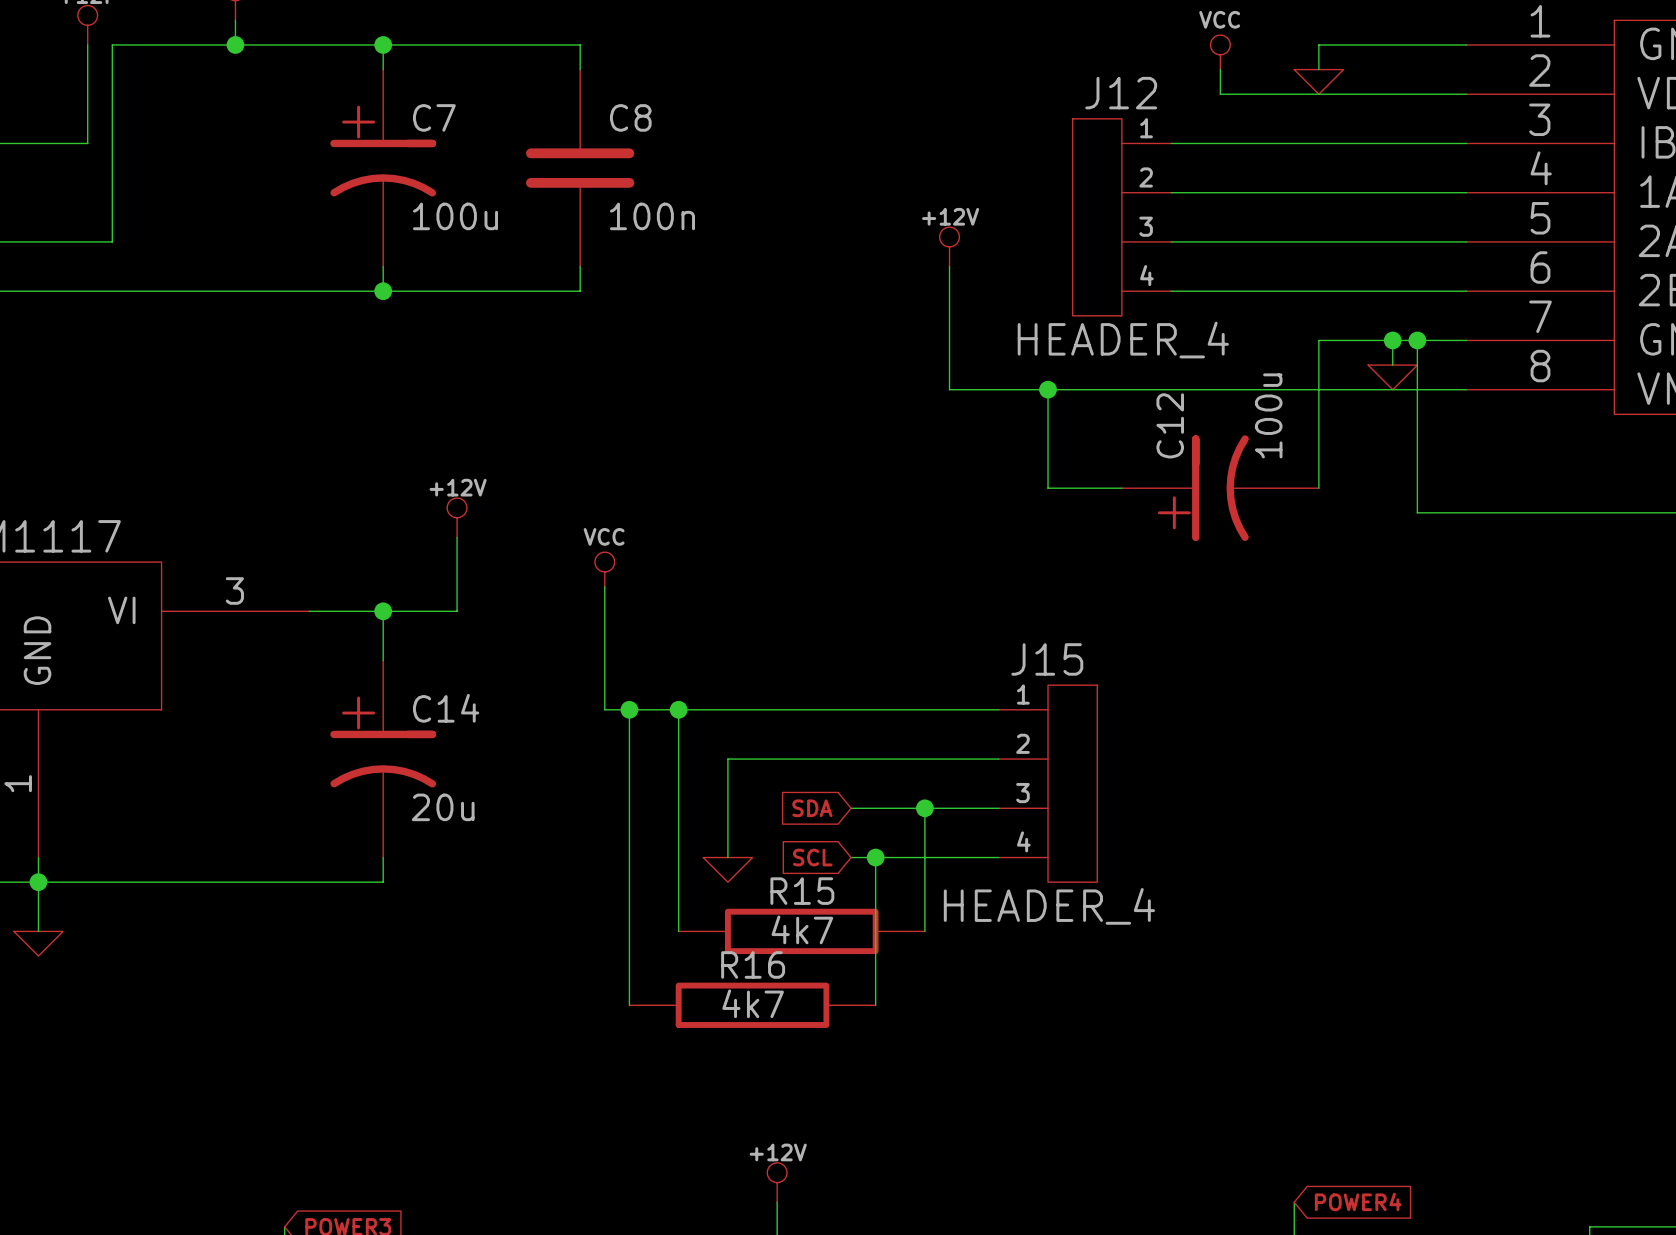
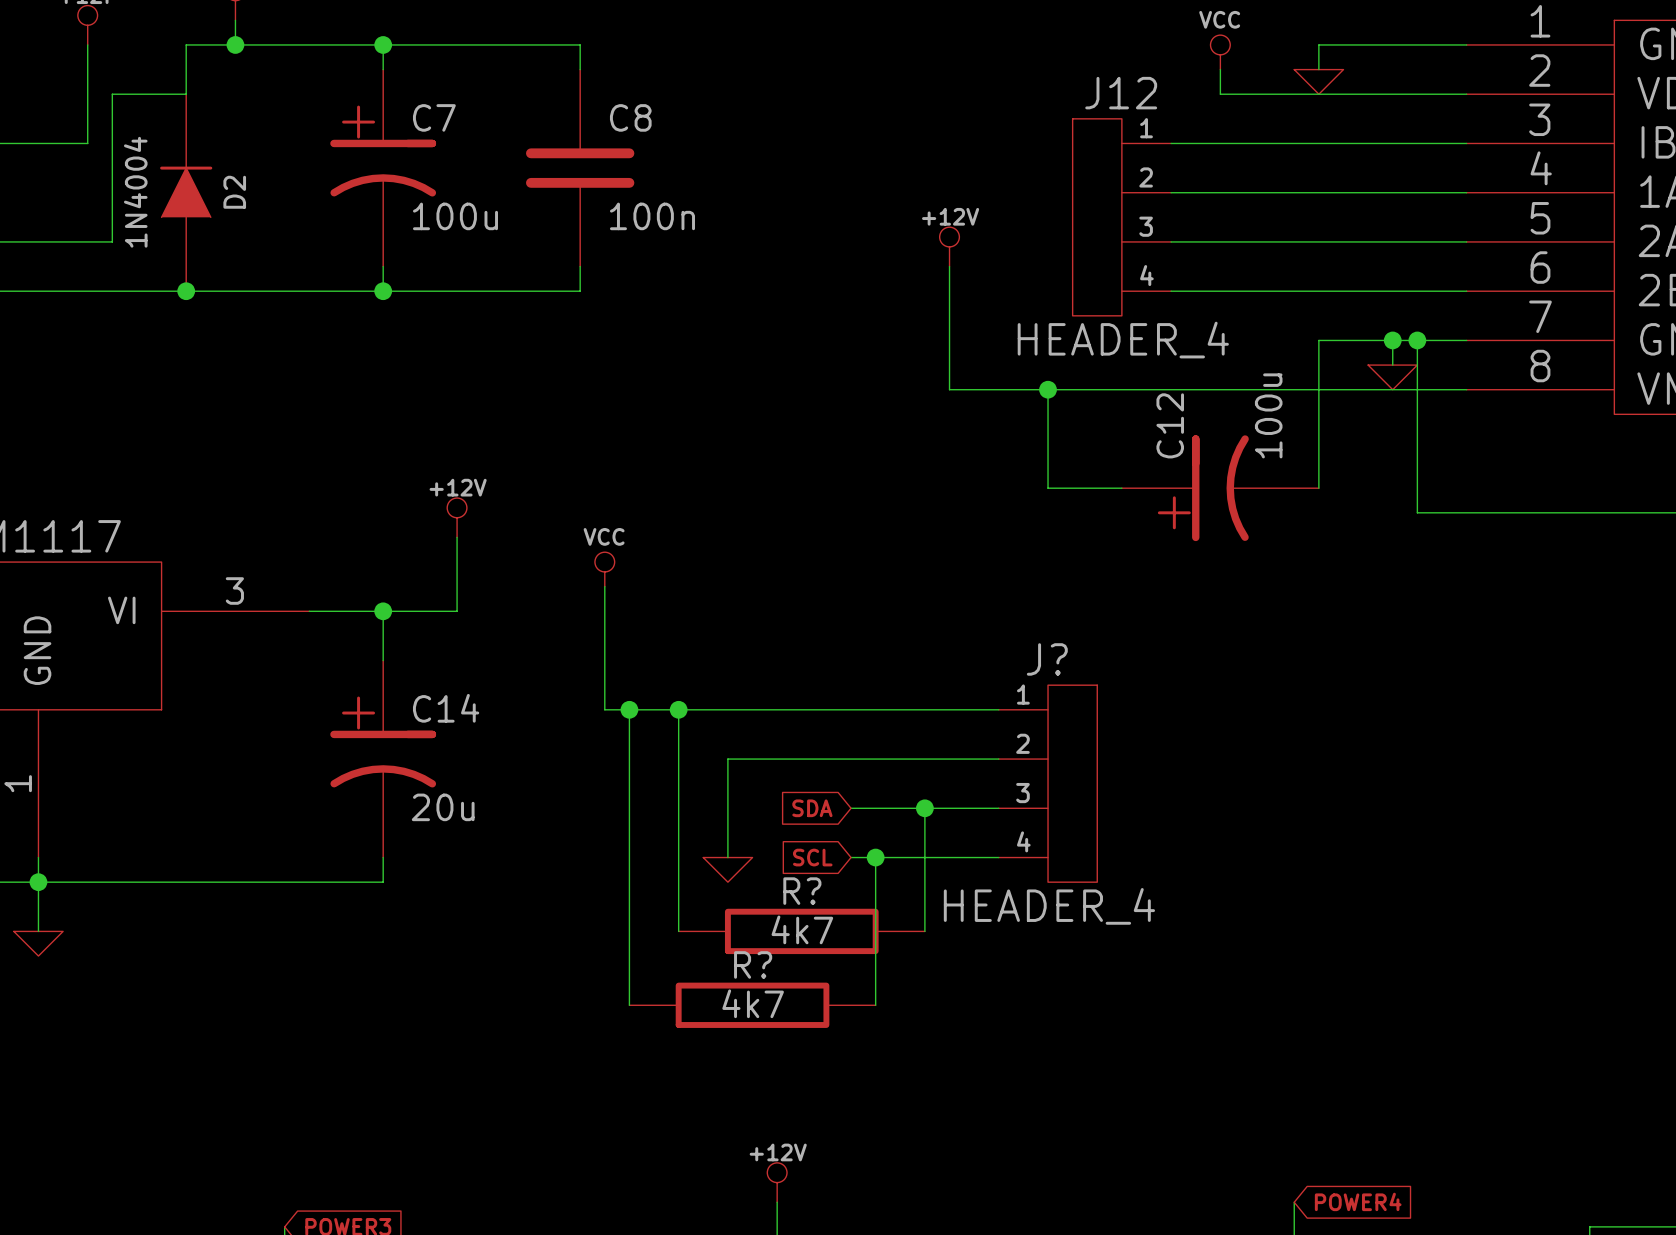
wire: (186, 44) (112, 44) (112, 94) -> (186, 44) (186, 94) (112, 94)
D2: none -> 1N4004 (186, 192)
junction: none -> (186, 291)
J15 name: J15 (1047, 659) -> J? (1047, 659)
R15 name: R15 (802, 891) -> R? (802, 891)
R16 name: R16 (753, 964) -> R? (753, 964)

